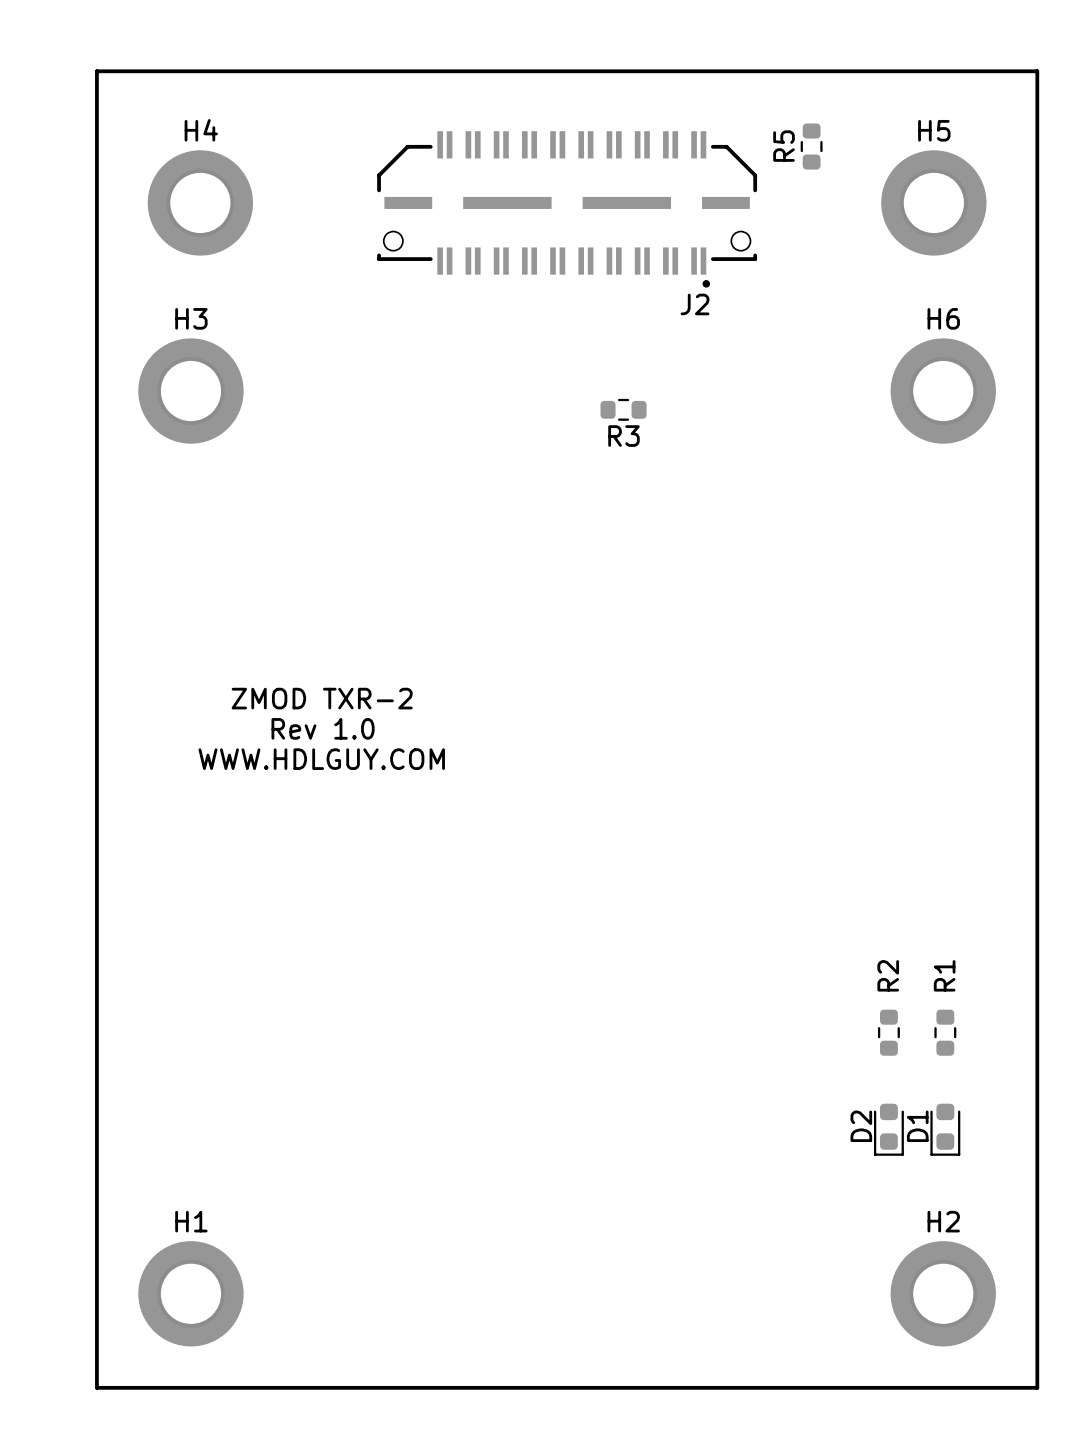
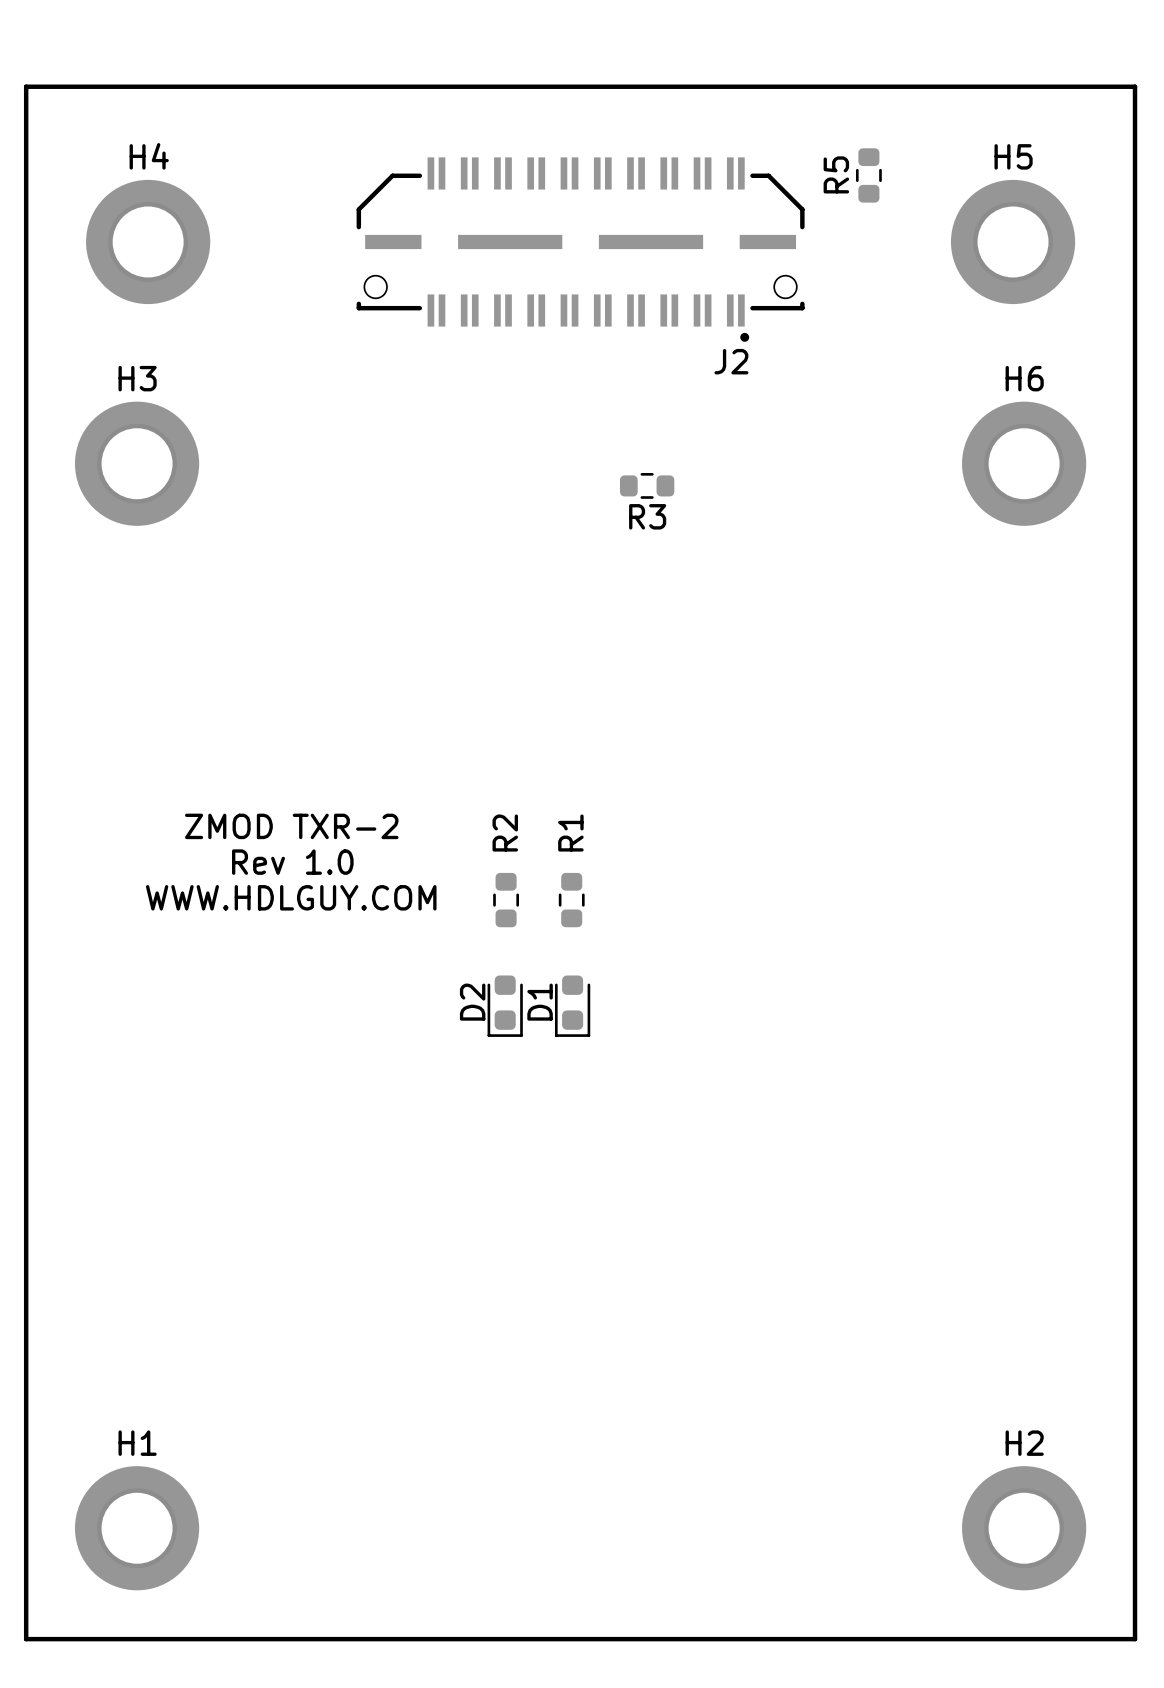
R2 position: (888, 1032) -> (506, 900)
R1 position: (945, 1032) -> (571, 900)
D2 position: (888, 1129) -> (505, 1006)
D1 position: (945, 1129) -> (572, 1006)

